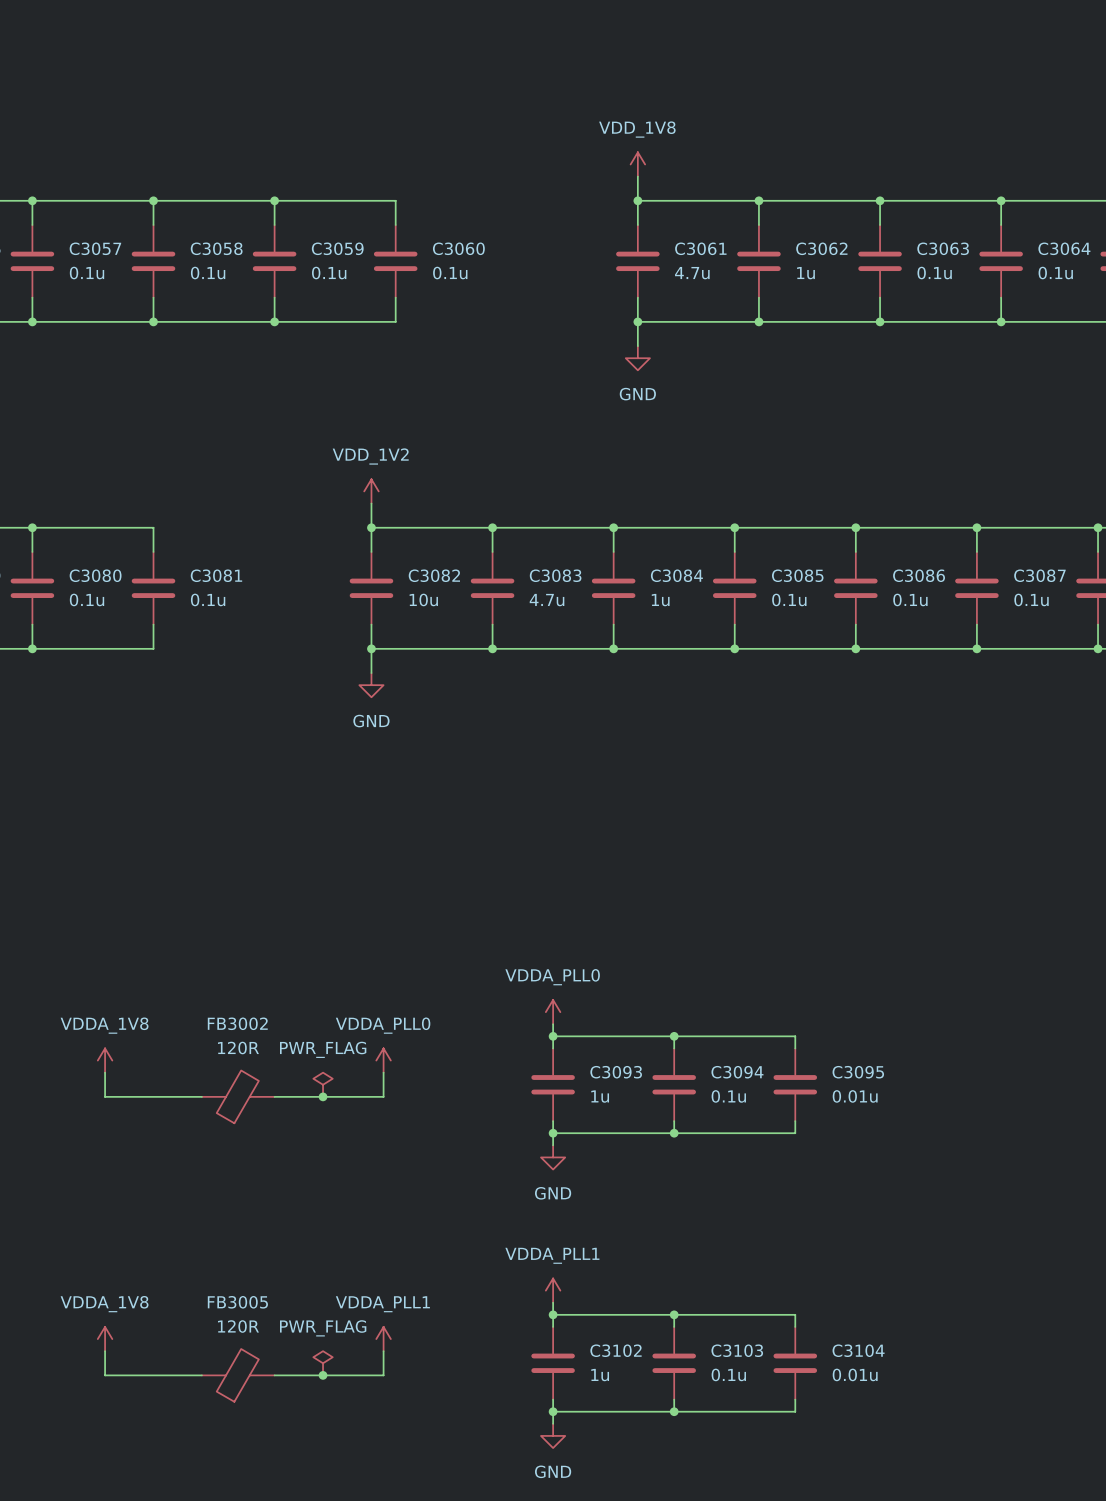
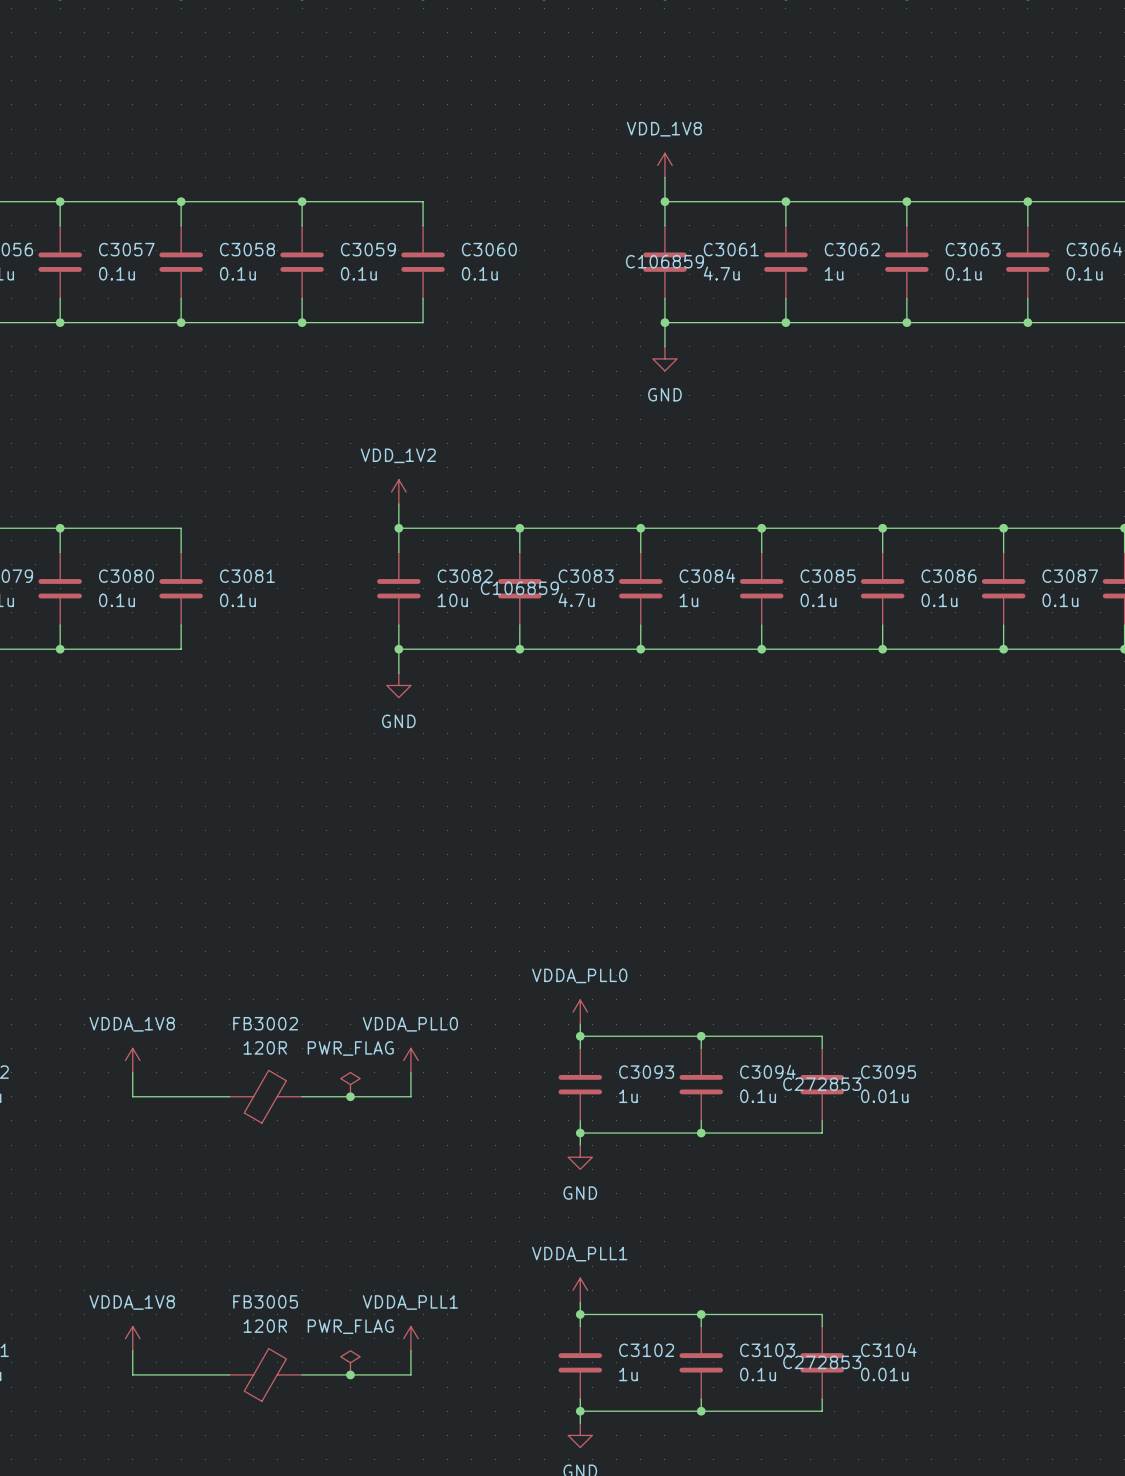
C3061 text: none -> C106859 (664, 261)
C3083 text: none -> C106859 (519, 588)
C3095 text: none -> C272853 (822, 1084)
C3104 text: none -> C272853 (822, 1362)

